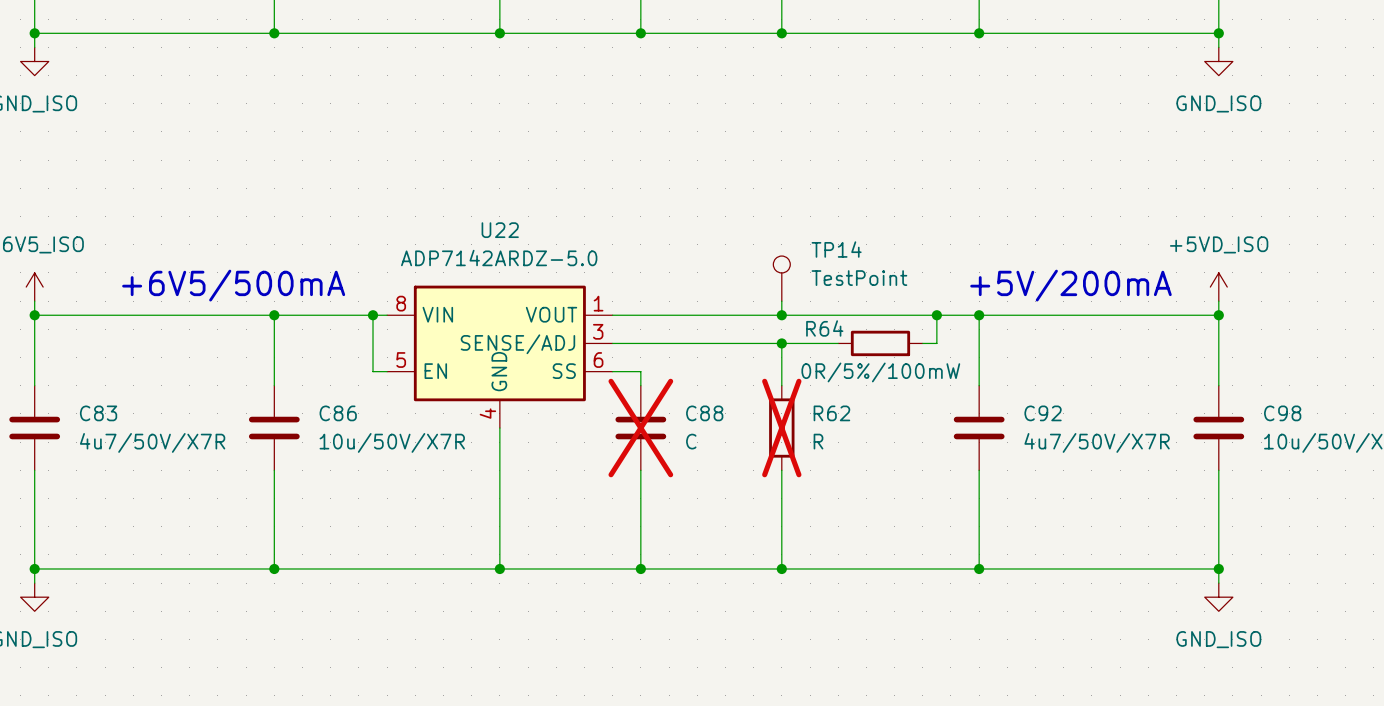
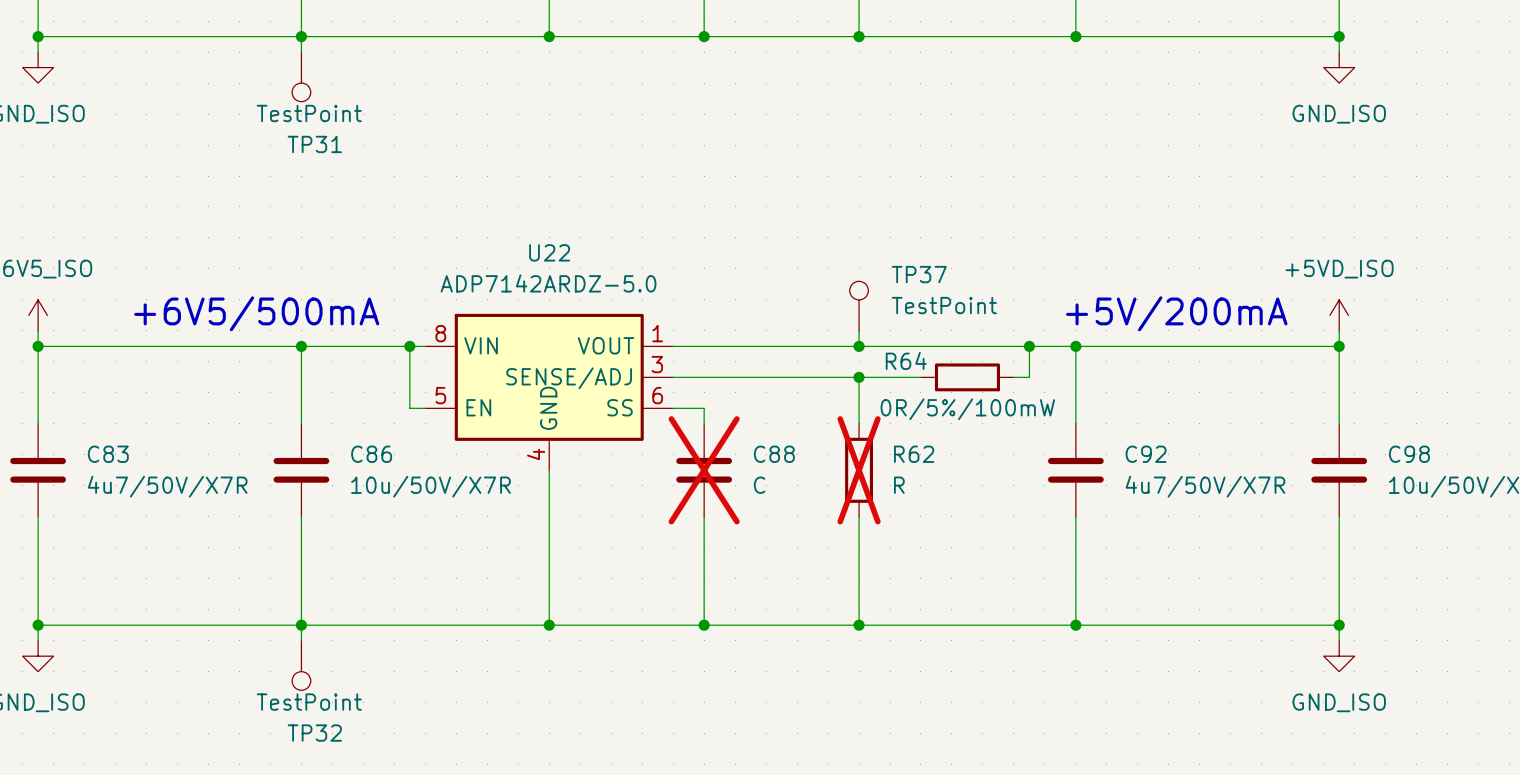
wire: none -> (301, 36) (301, 52)
TP31: none -> TestPoint (301, 76)
TP14 name: TP14 (836, 249) -> TP37 (919, 274)
wire: none -> (301, 625) (301, 640)
TP32: none -> TestPoint (301, 665)

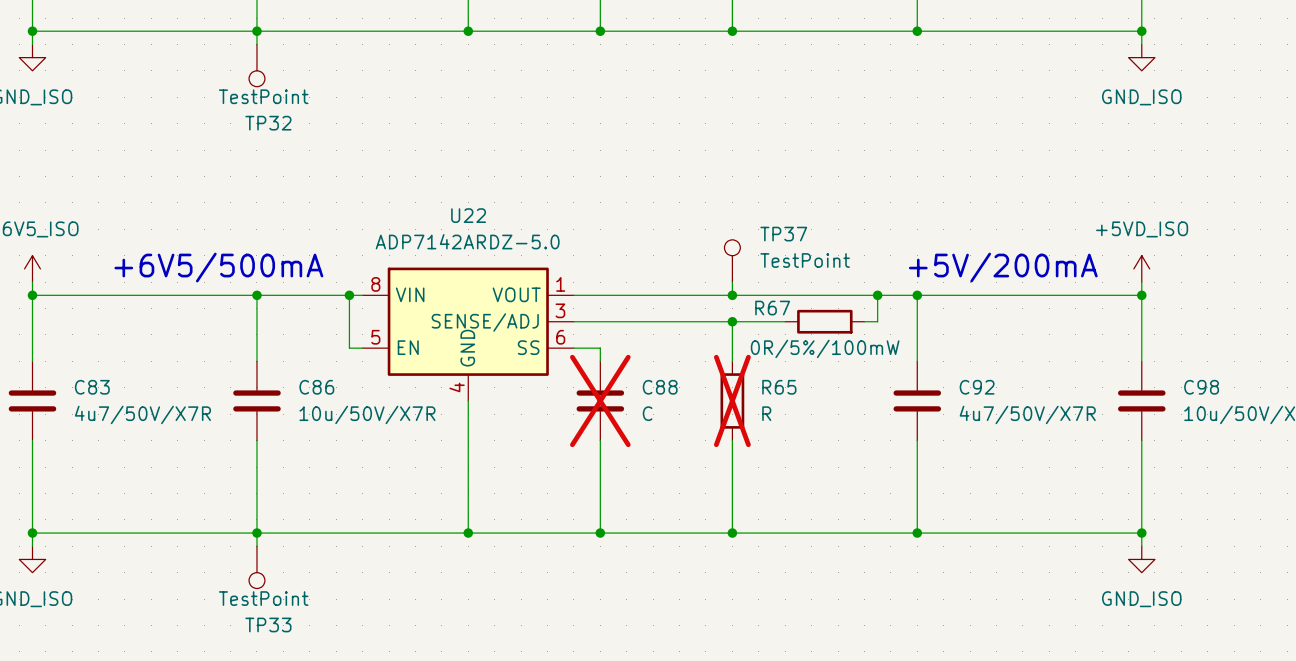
TP31 name: TP31 (314, 144) -> TP32 (268, 123)
R64 name: R64 (906, 360) -> R67 (772, 308)
R62 name: R62 (914, 454) -> R65 (779, 387)
TP32 name: TP32 (314, 733) -> TP33 (268, 624)

